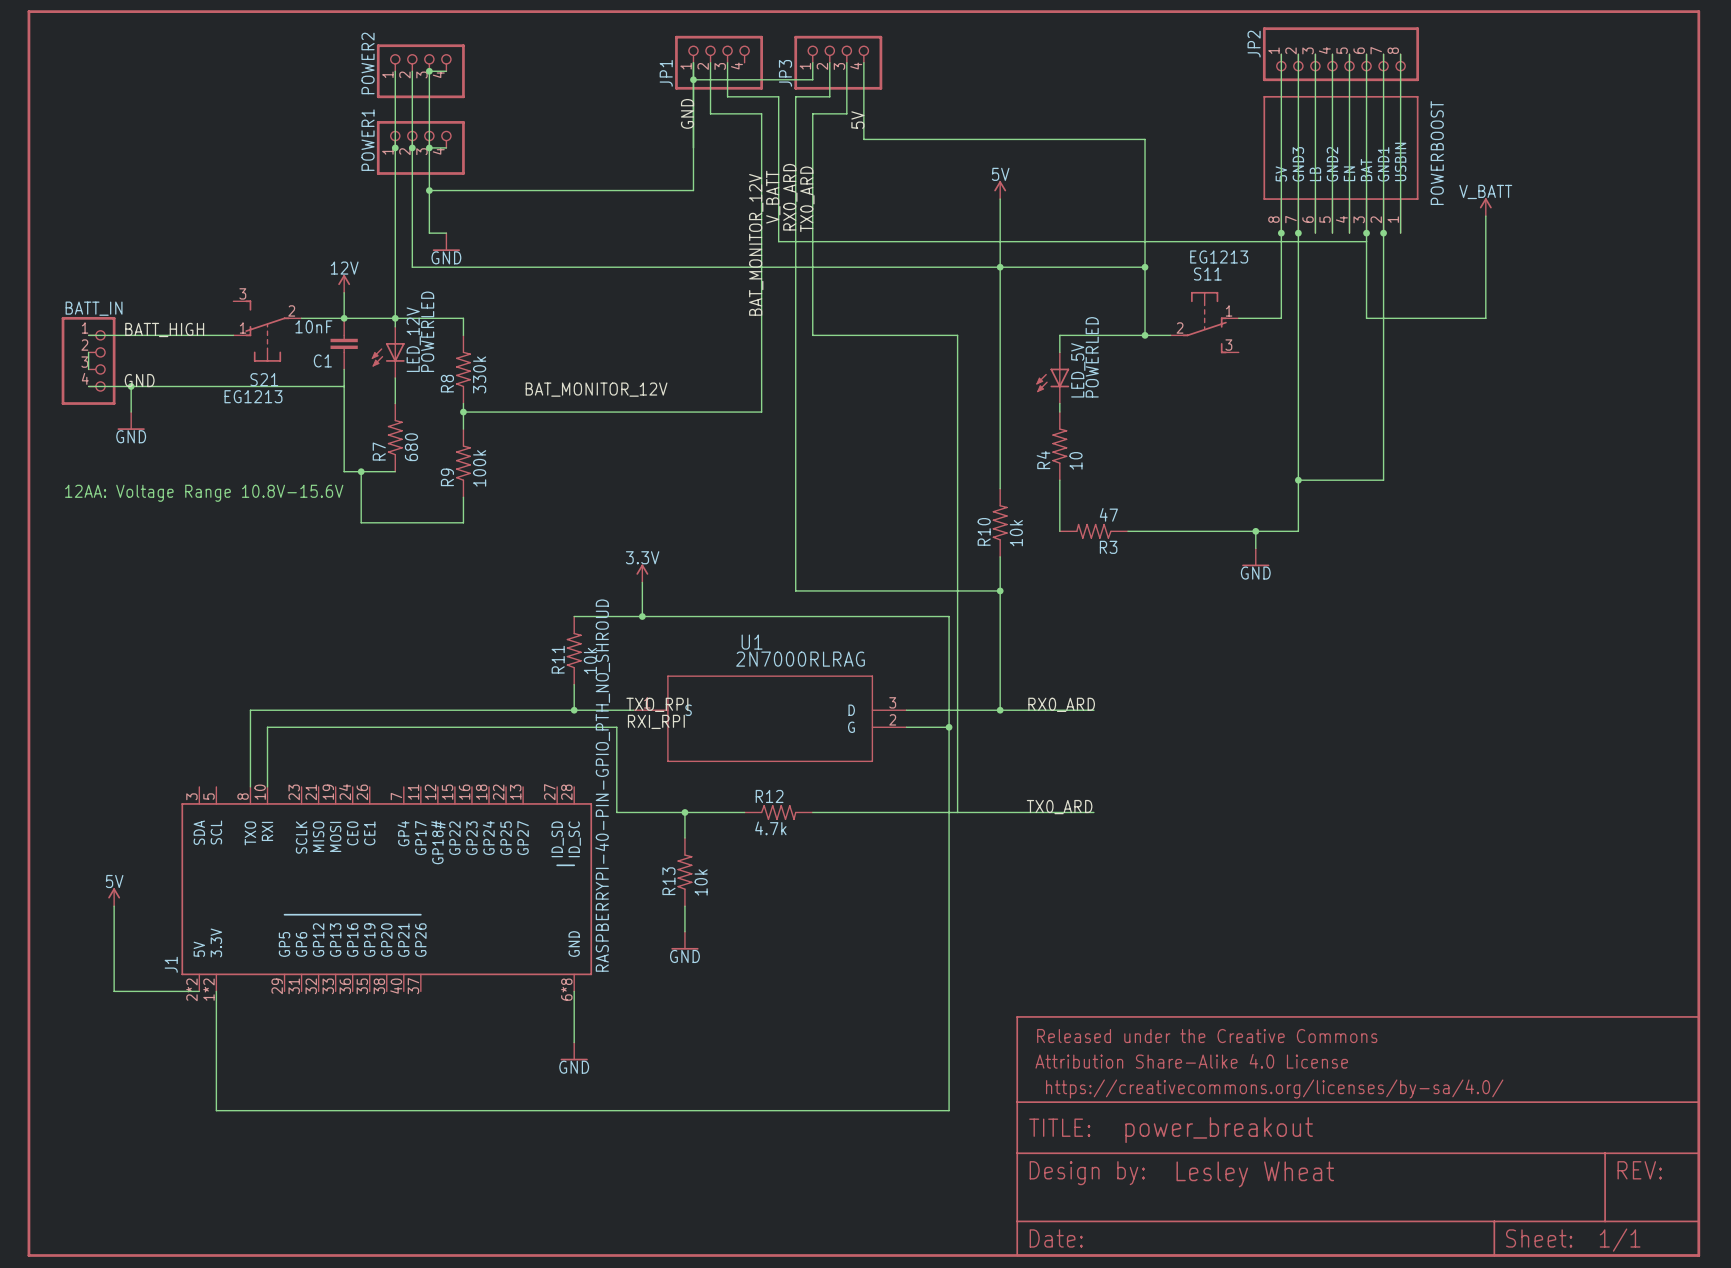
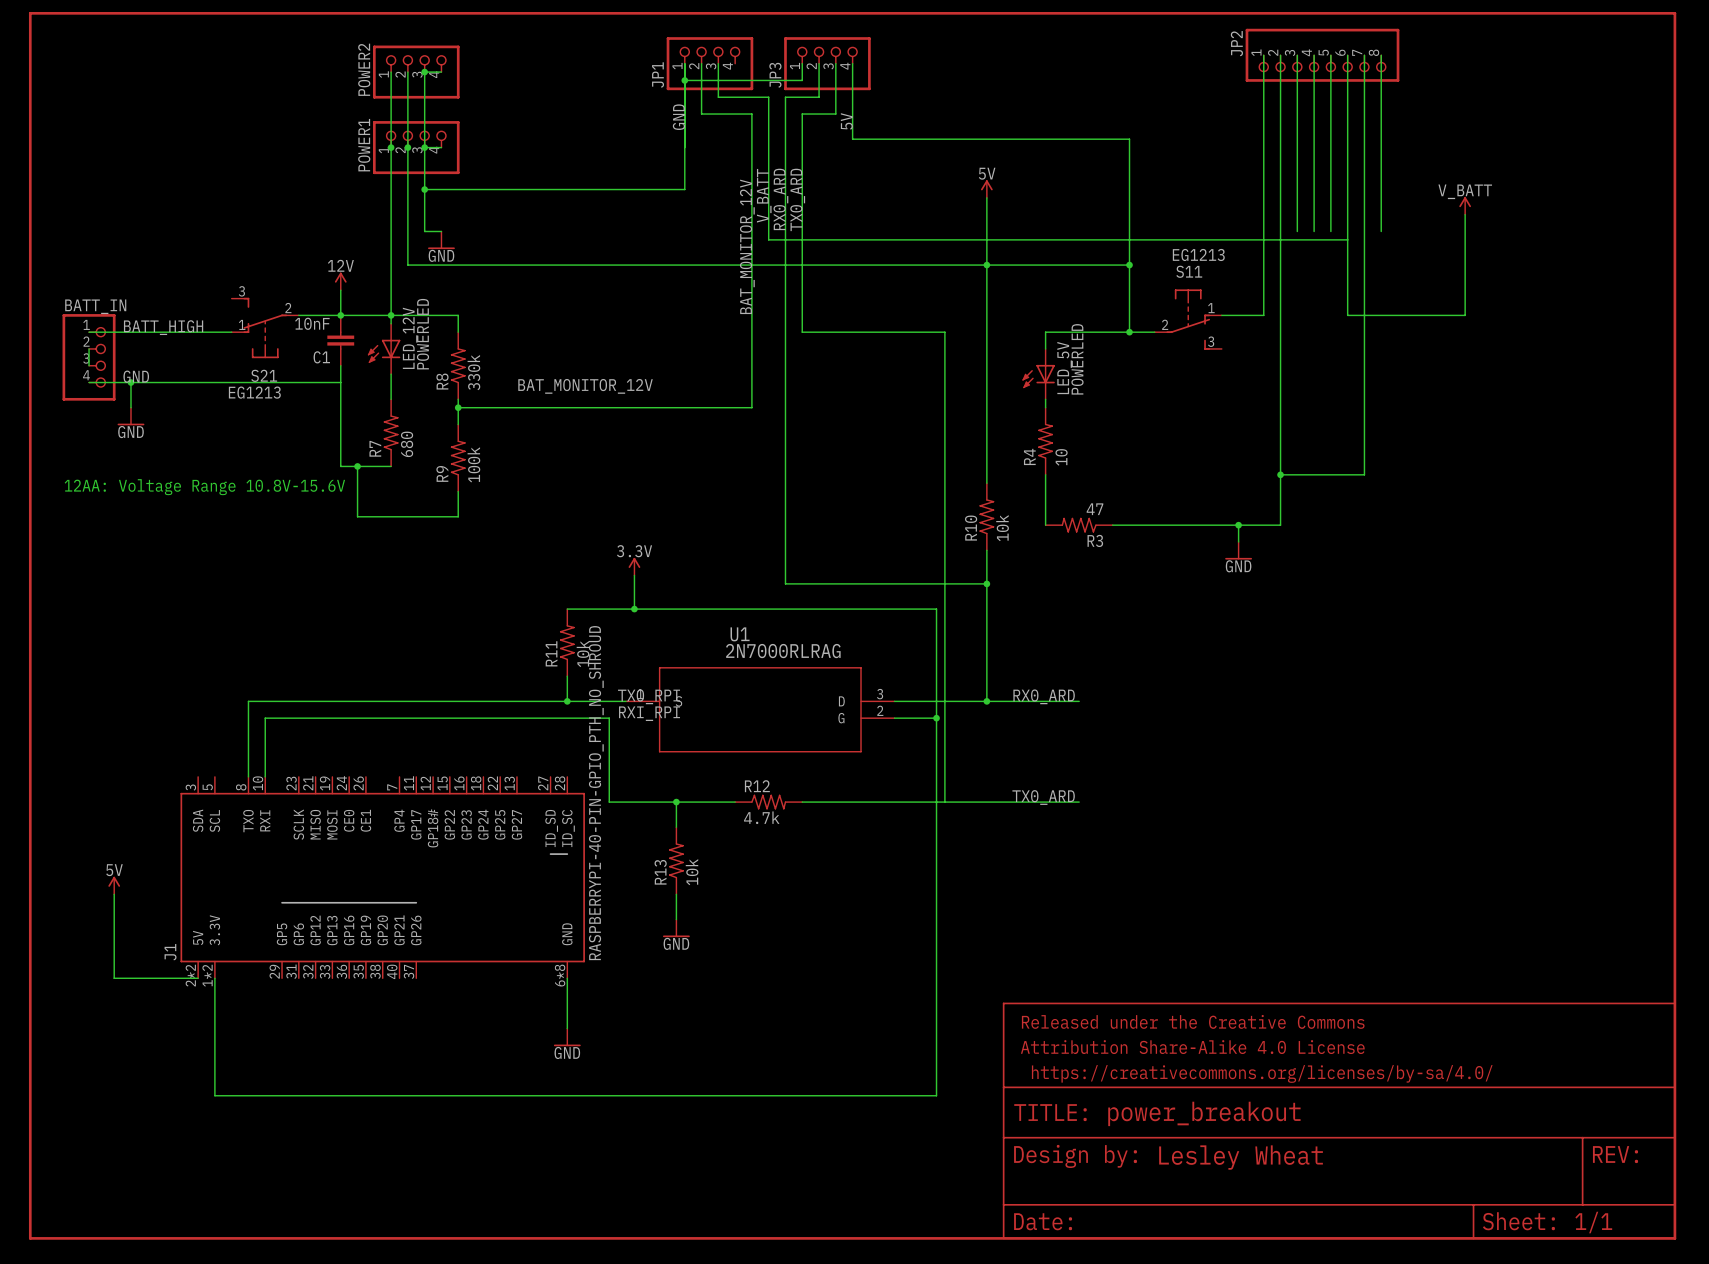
part: (1340, 164) -> none
junction: (1281, 233) -> none
junction: (1298, 233) -> none
junction: (1366, 233) -> none
junction: (1383, 233) -> none

